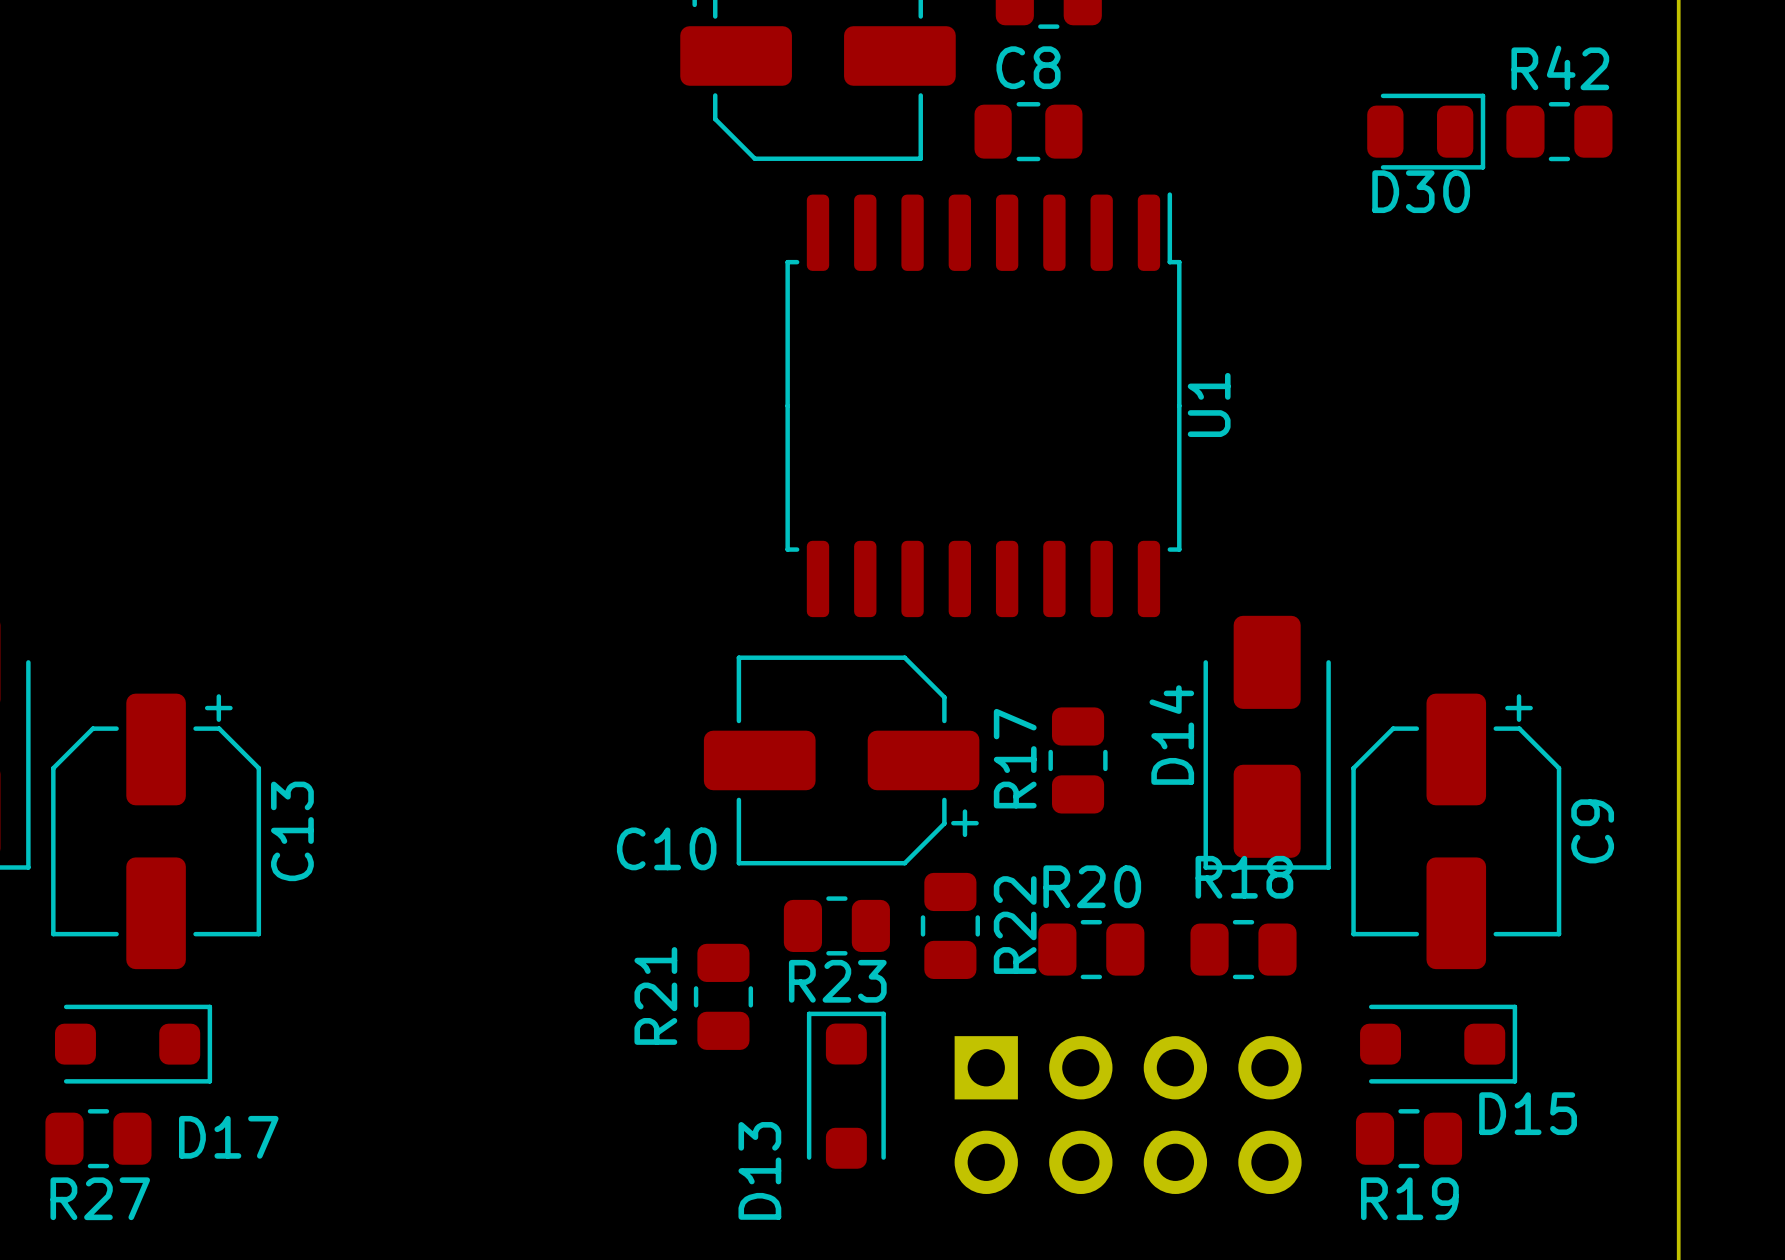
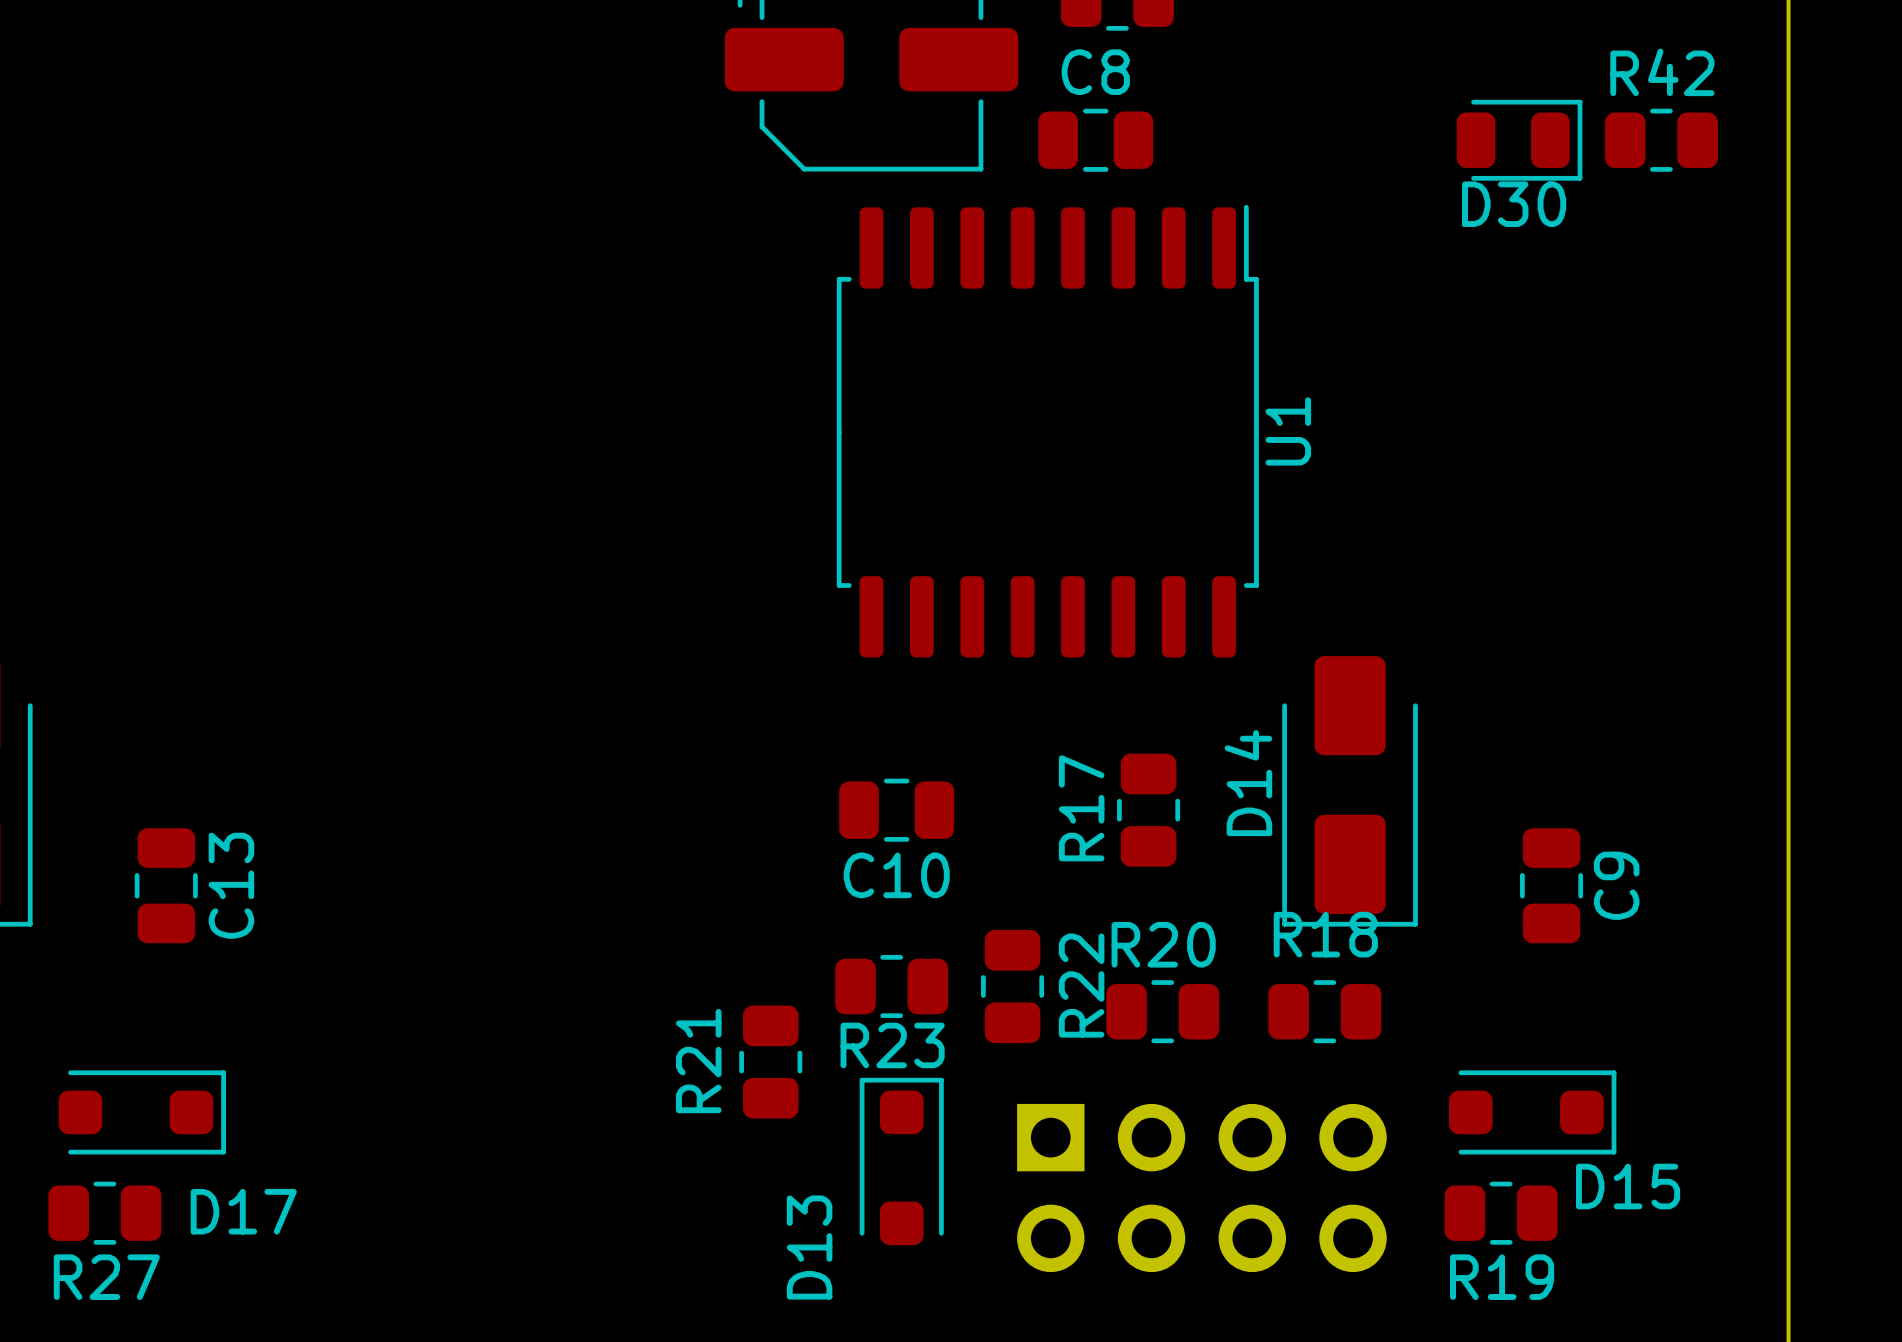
C10 footprint: [703, 655, 980, 866] -> [839, 778, 955, 842]
C13 footprint: [51, 693, 262, 970] -> [134, 828, 198, 944]
C9 footprint: [1351, 693, 1562, 970] -> [1520, 828, 1584, 944]
C13 name position: C13 (292, 831) -> C13 (231, 885)
C9 name position: C9 (1592, 831) -> C9 (1616, 885)
C10 name position: C10 (666, 848) -> C10 (896, 875)

